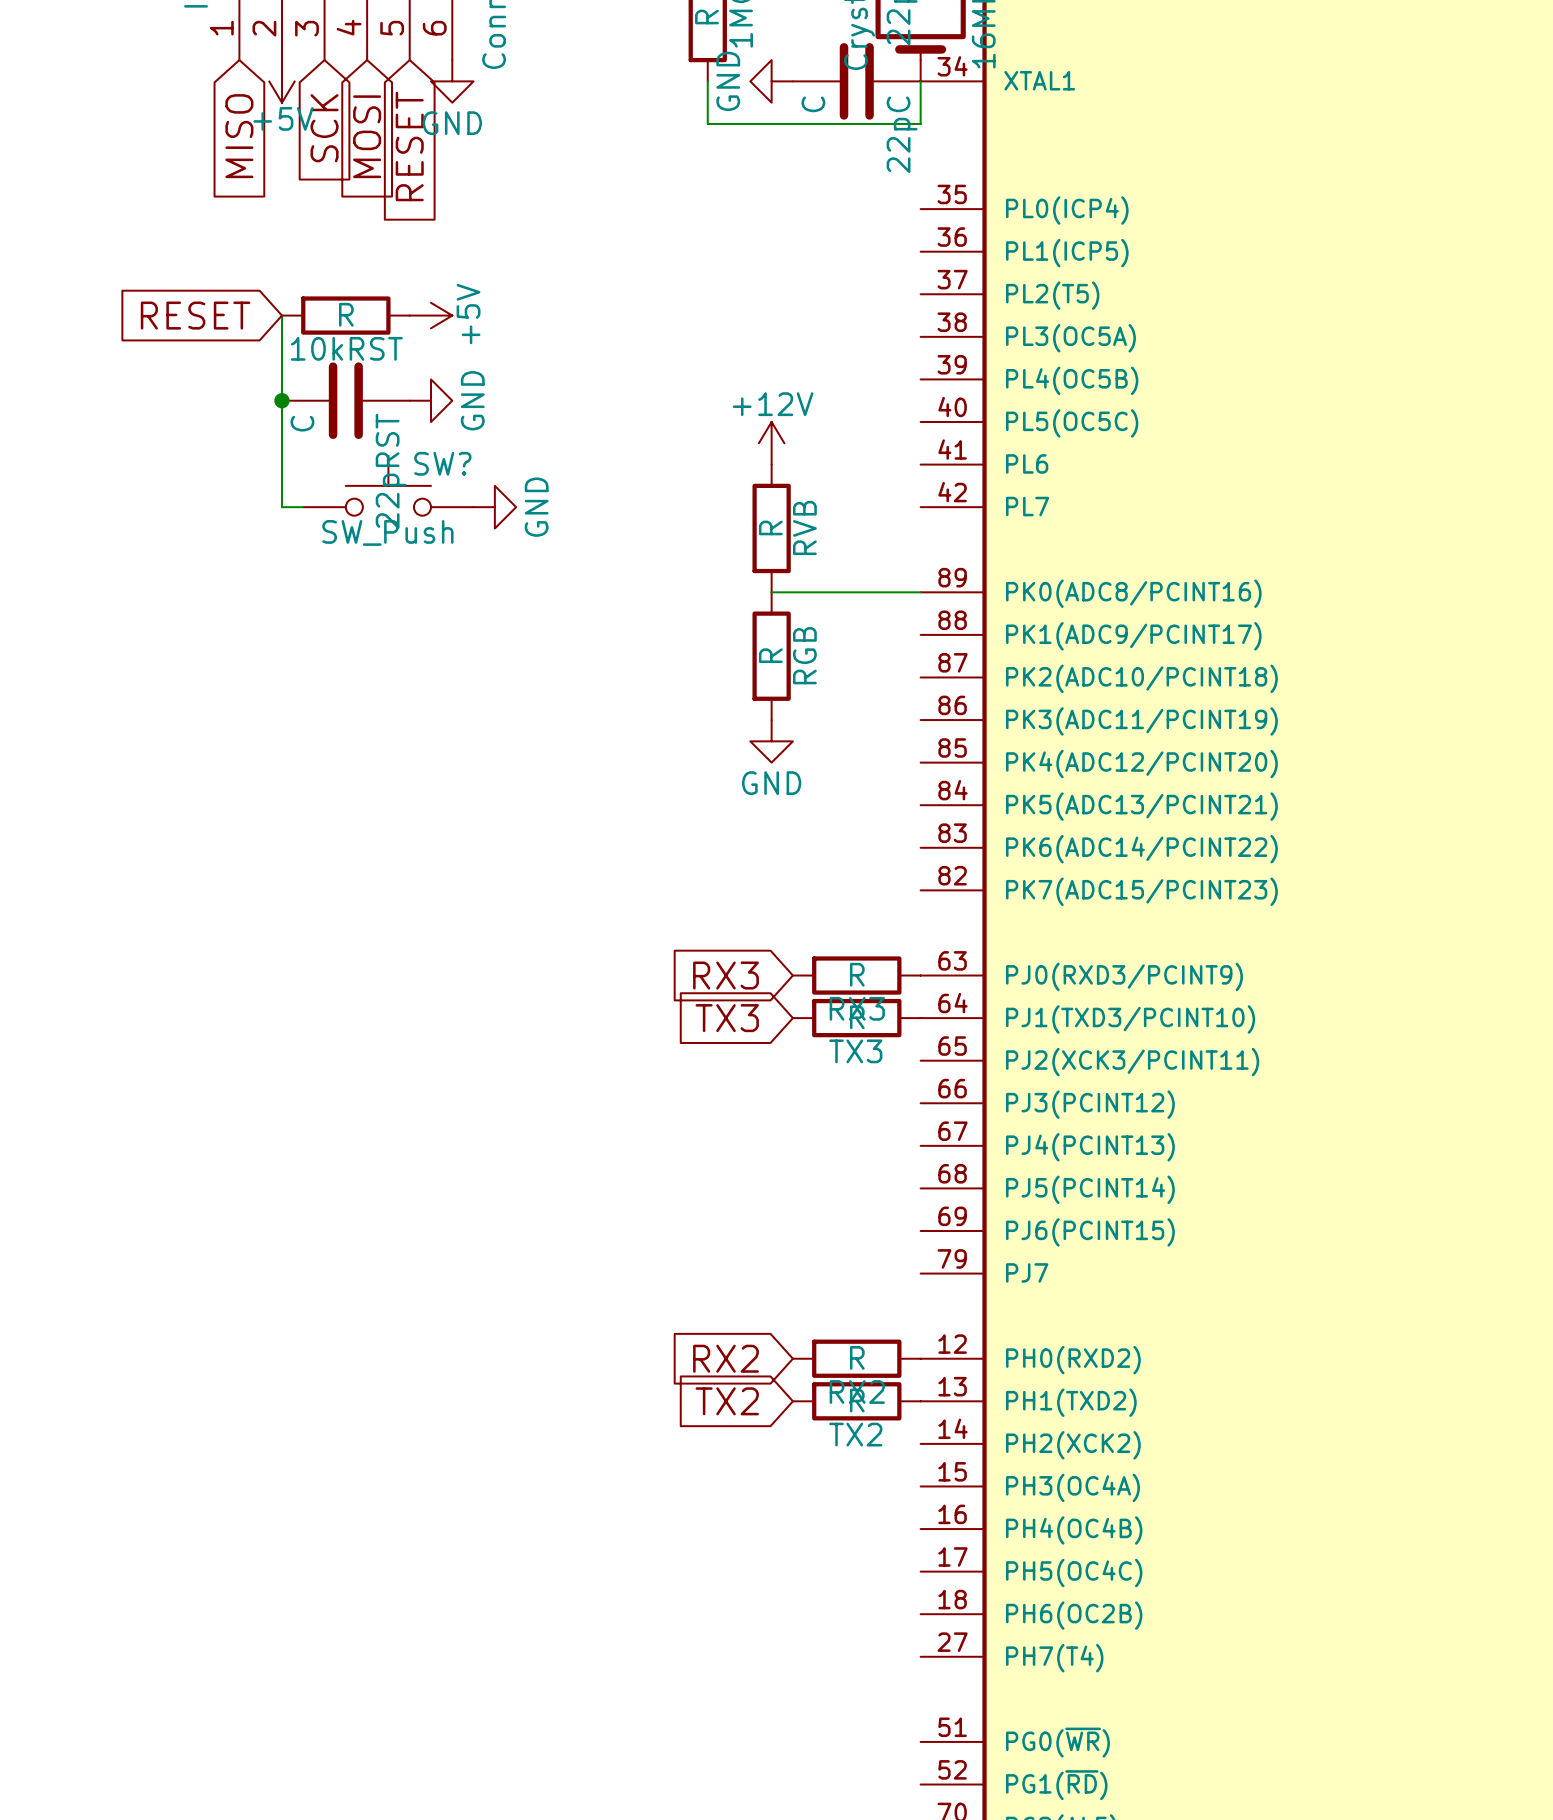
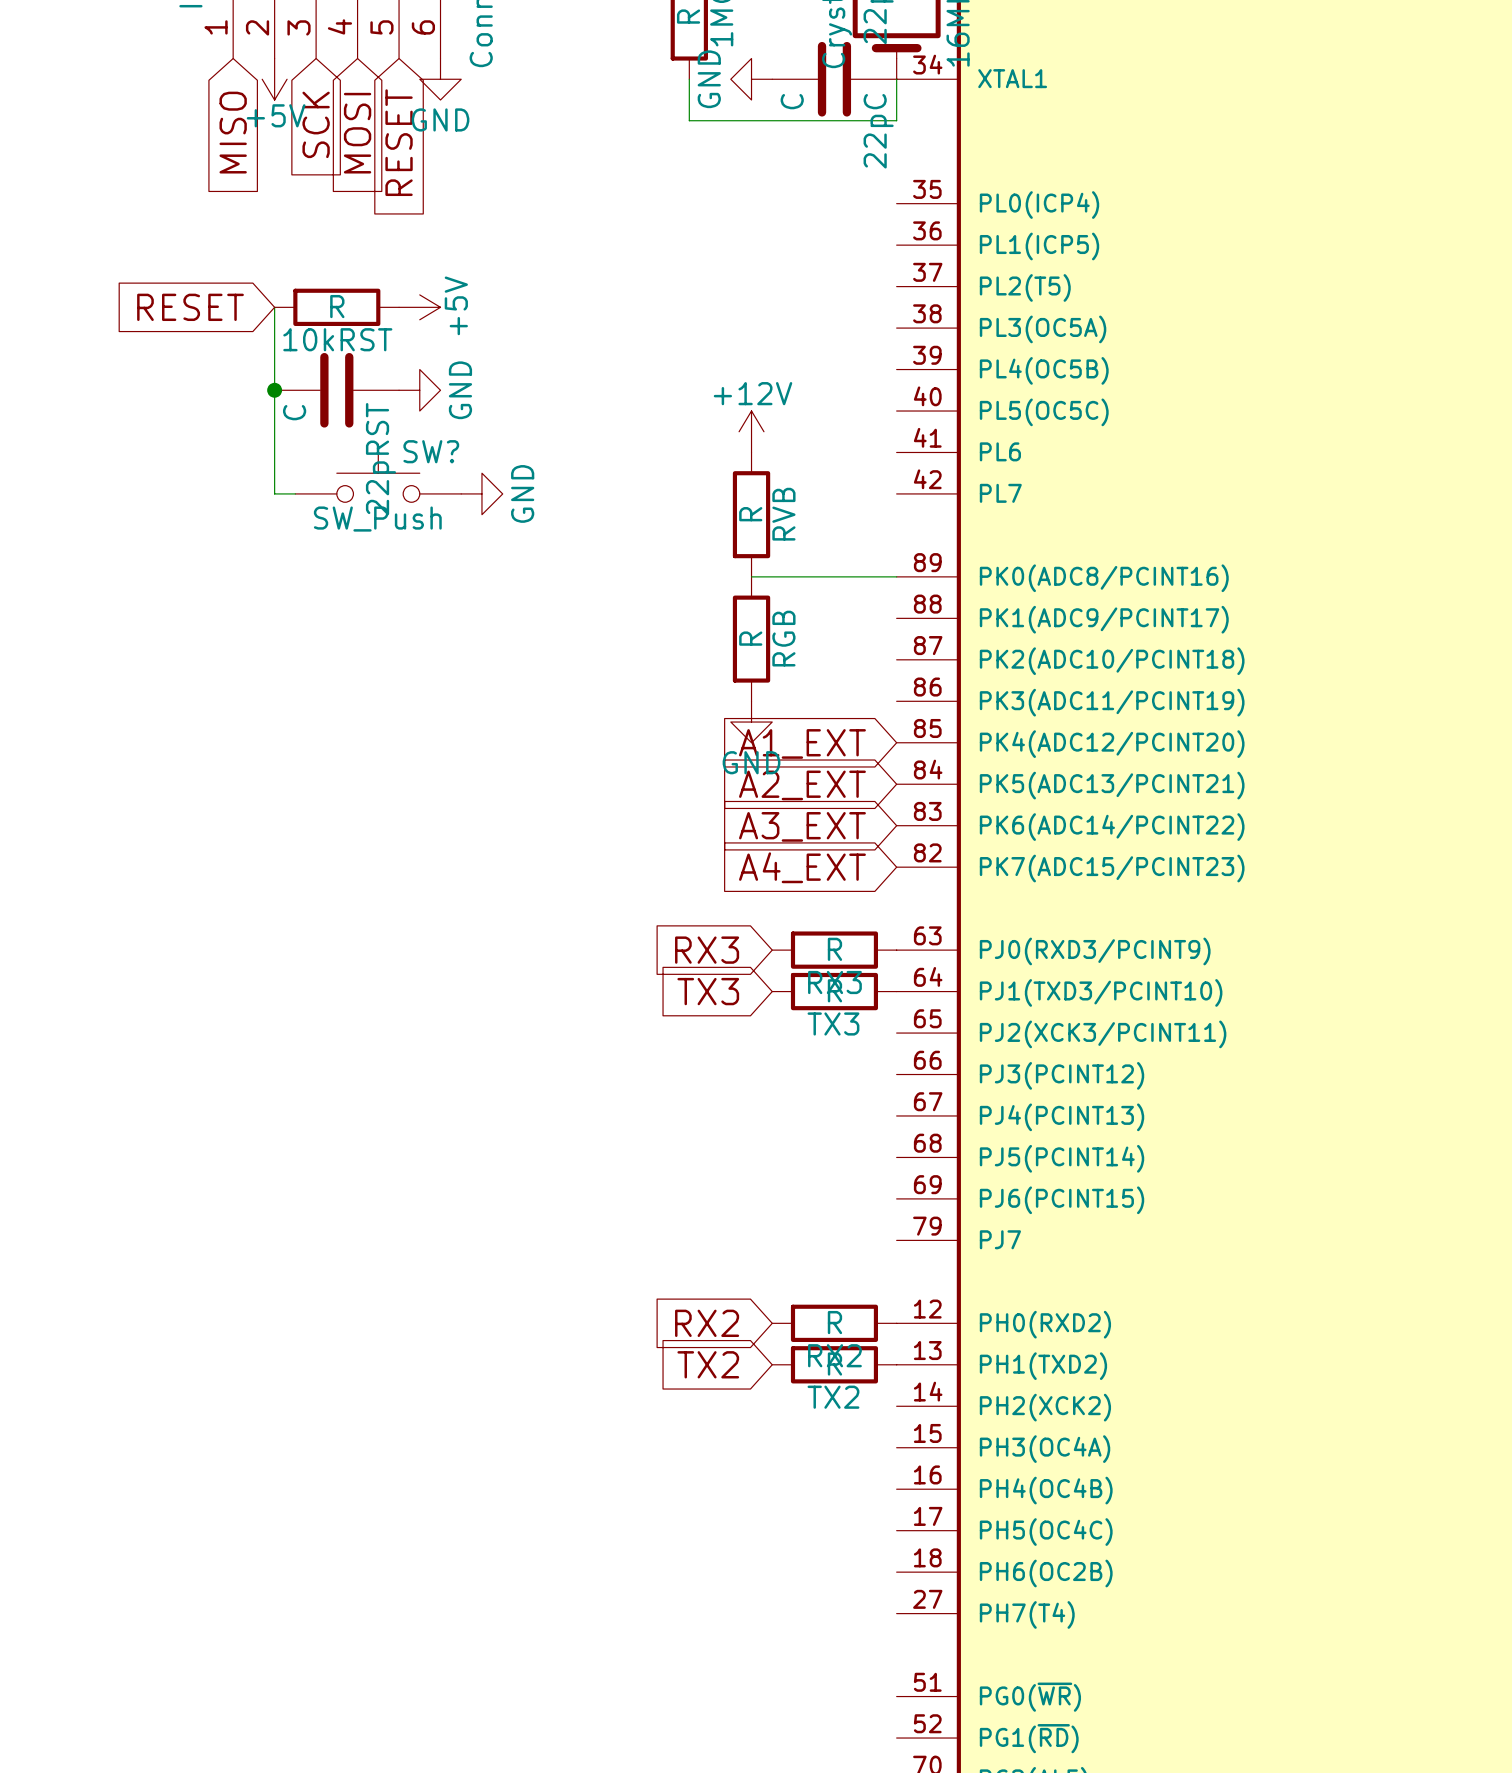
global label: none -> A1_EXT (802, 743)
global label: none -> A2_EXT (802, 785)
global label: none -> A3_EXT (802, 826)
global label: none -> A4_EXT (802, 867)

